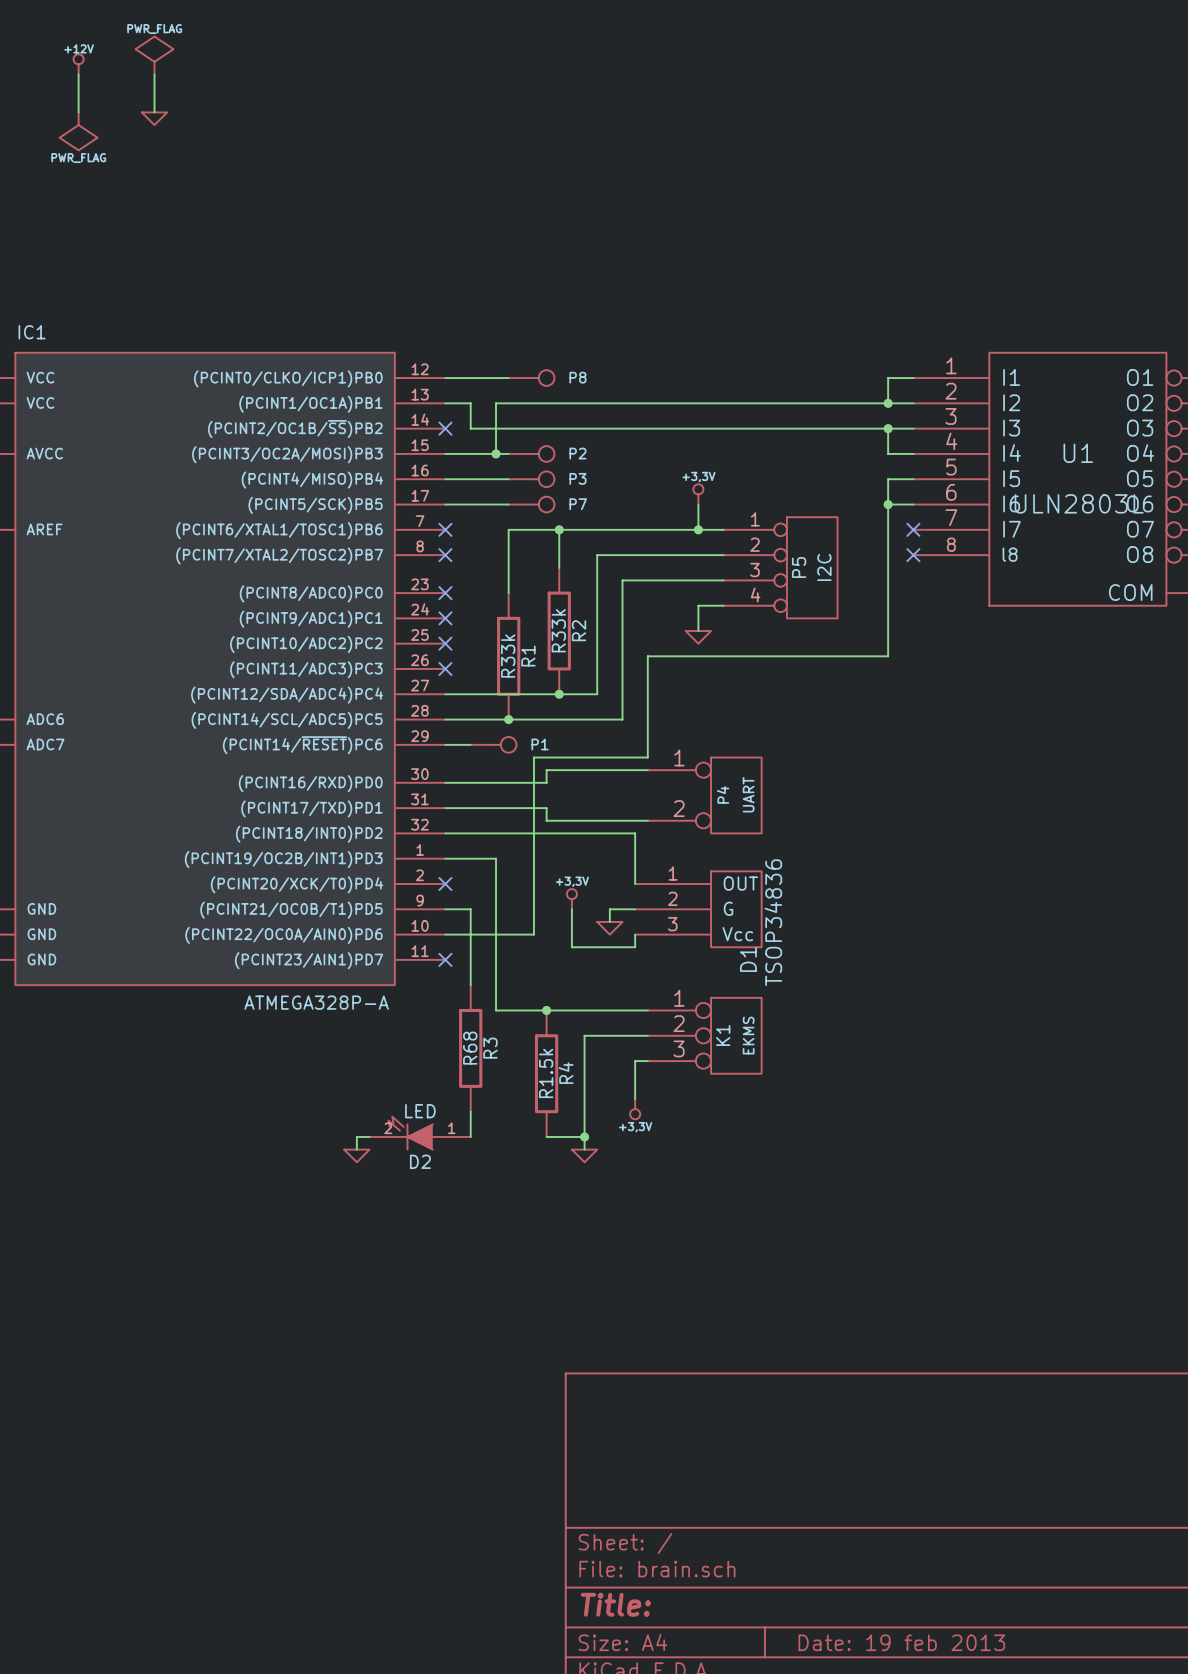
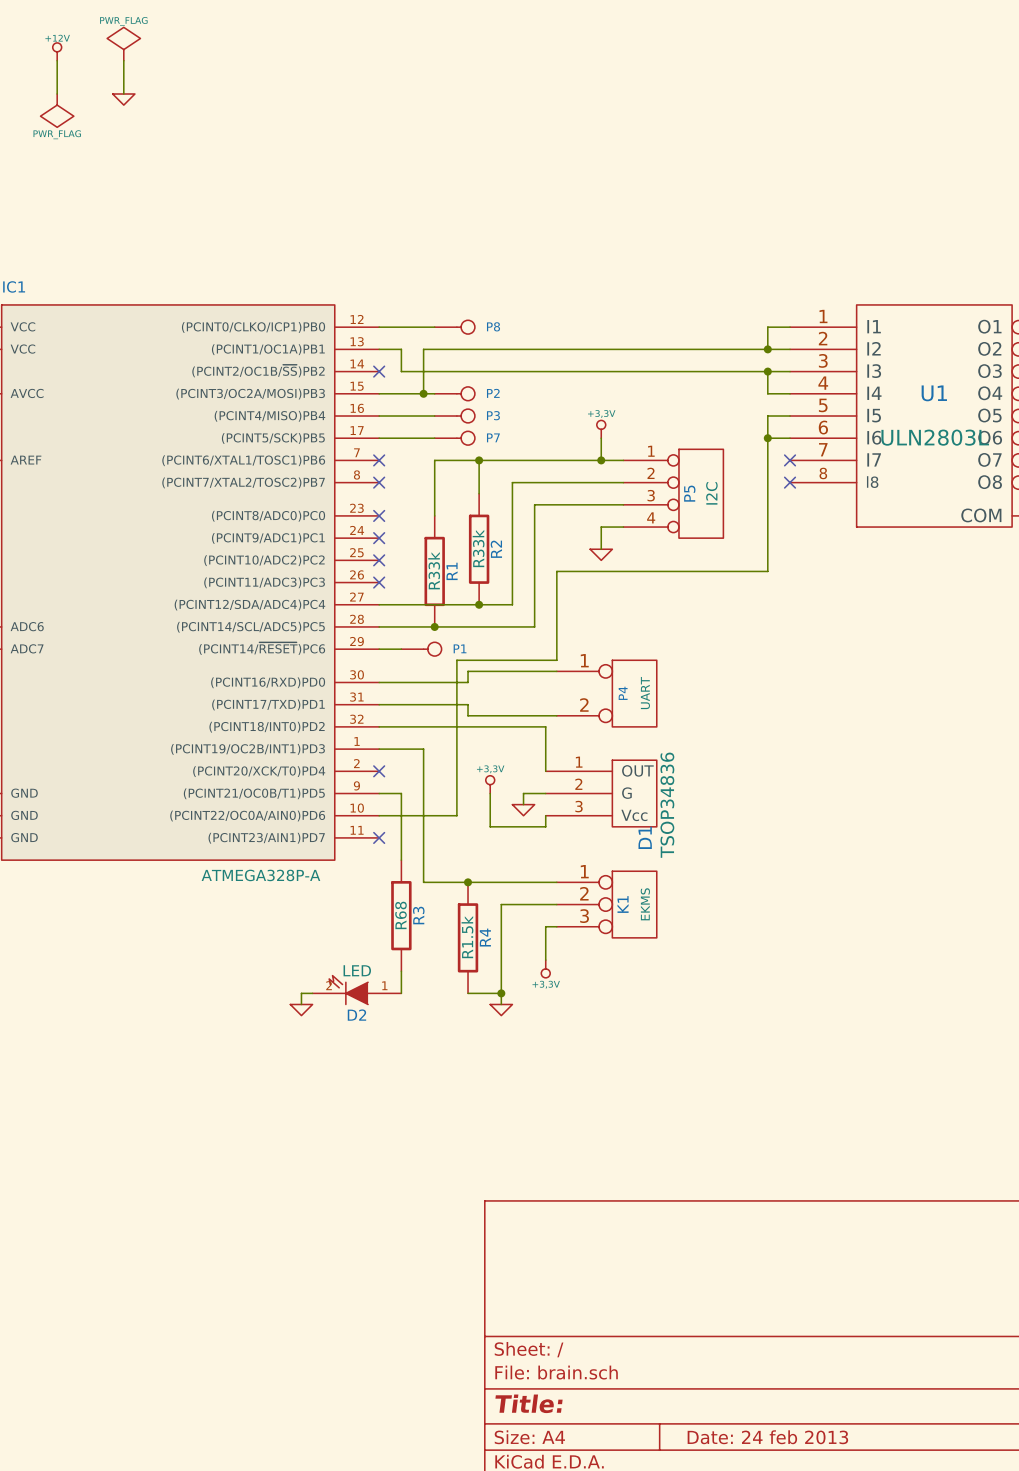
title block: Date: 19 feb 2013 (901, 1642) -> Date: 24 feb 2013 (767, 1437)

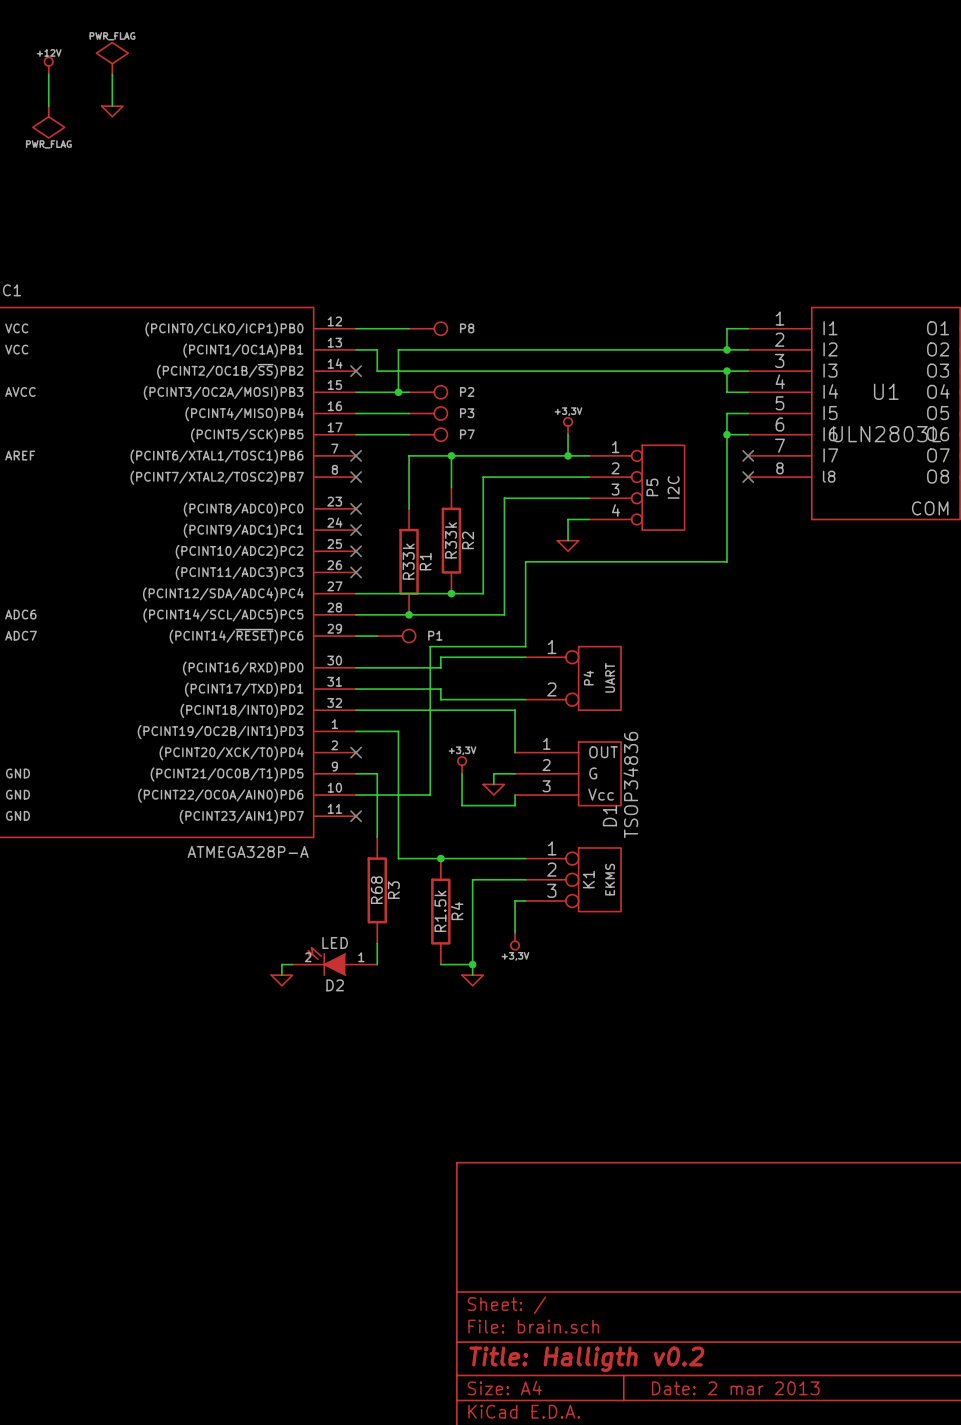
title block: Title: (529, 1403) -> Title: Halligth v0.2 (586, 1359)
title block: Date: 24 feb 2013 (767, 1437) -> Date: 2 mar 2013 (735, 1388)

